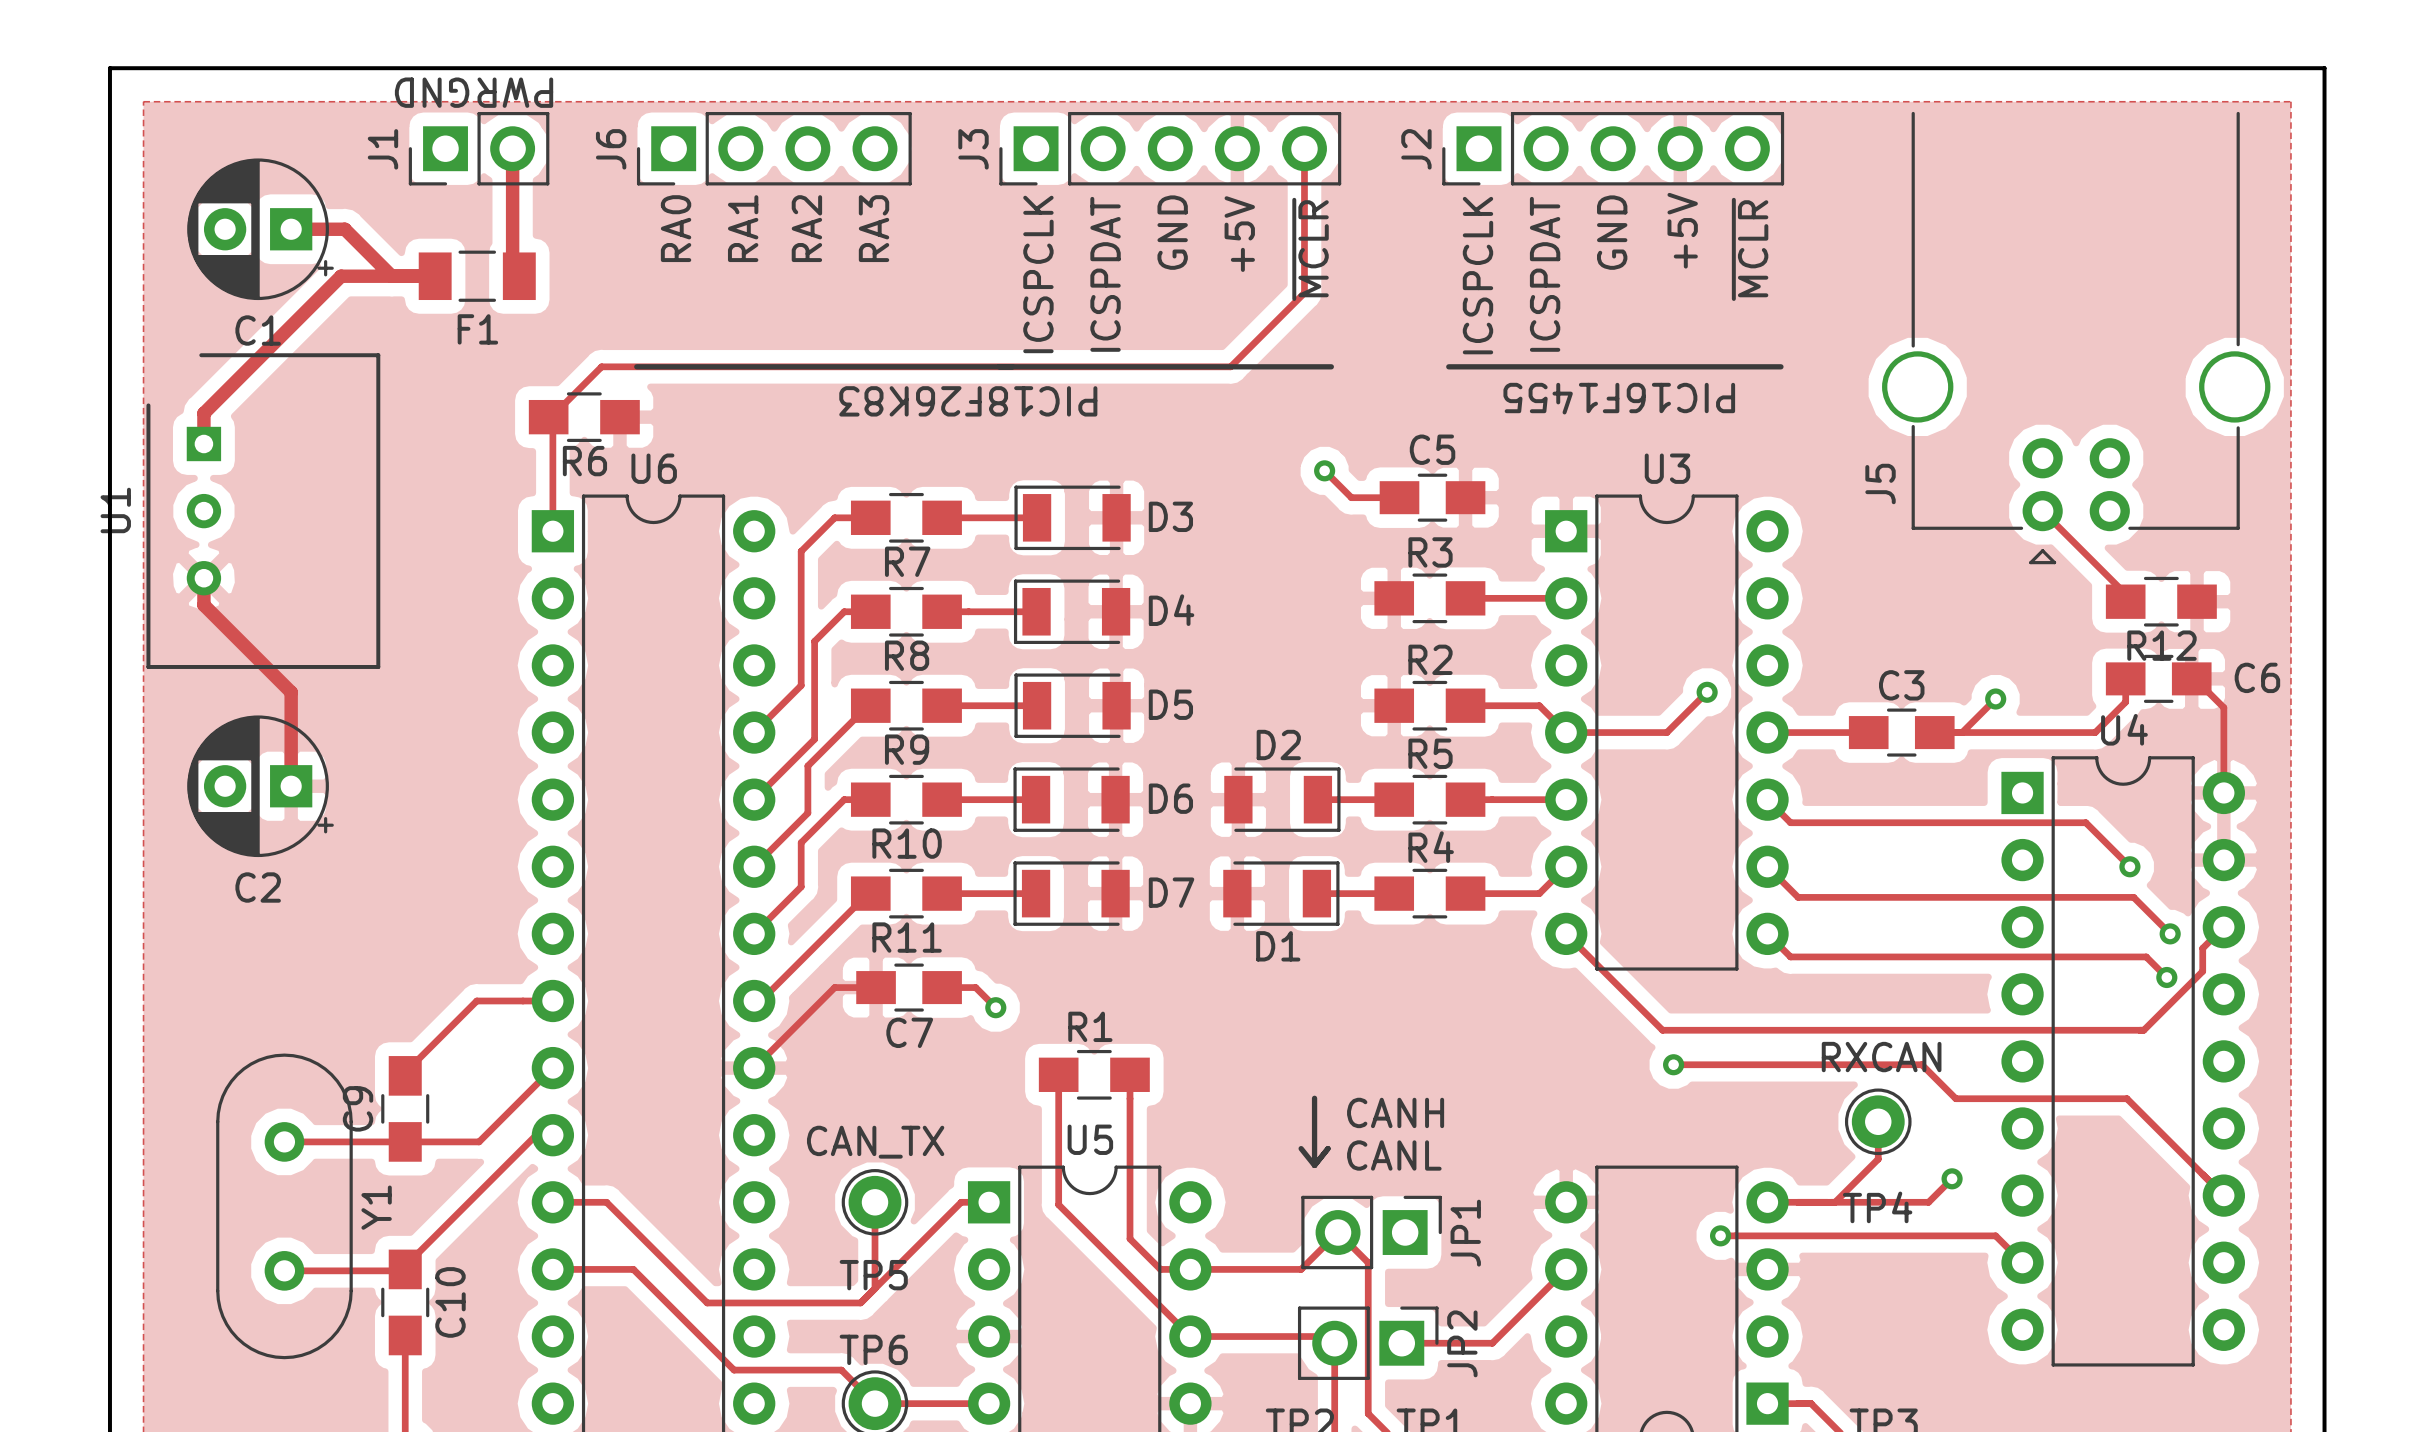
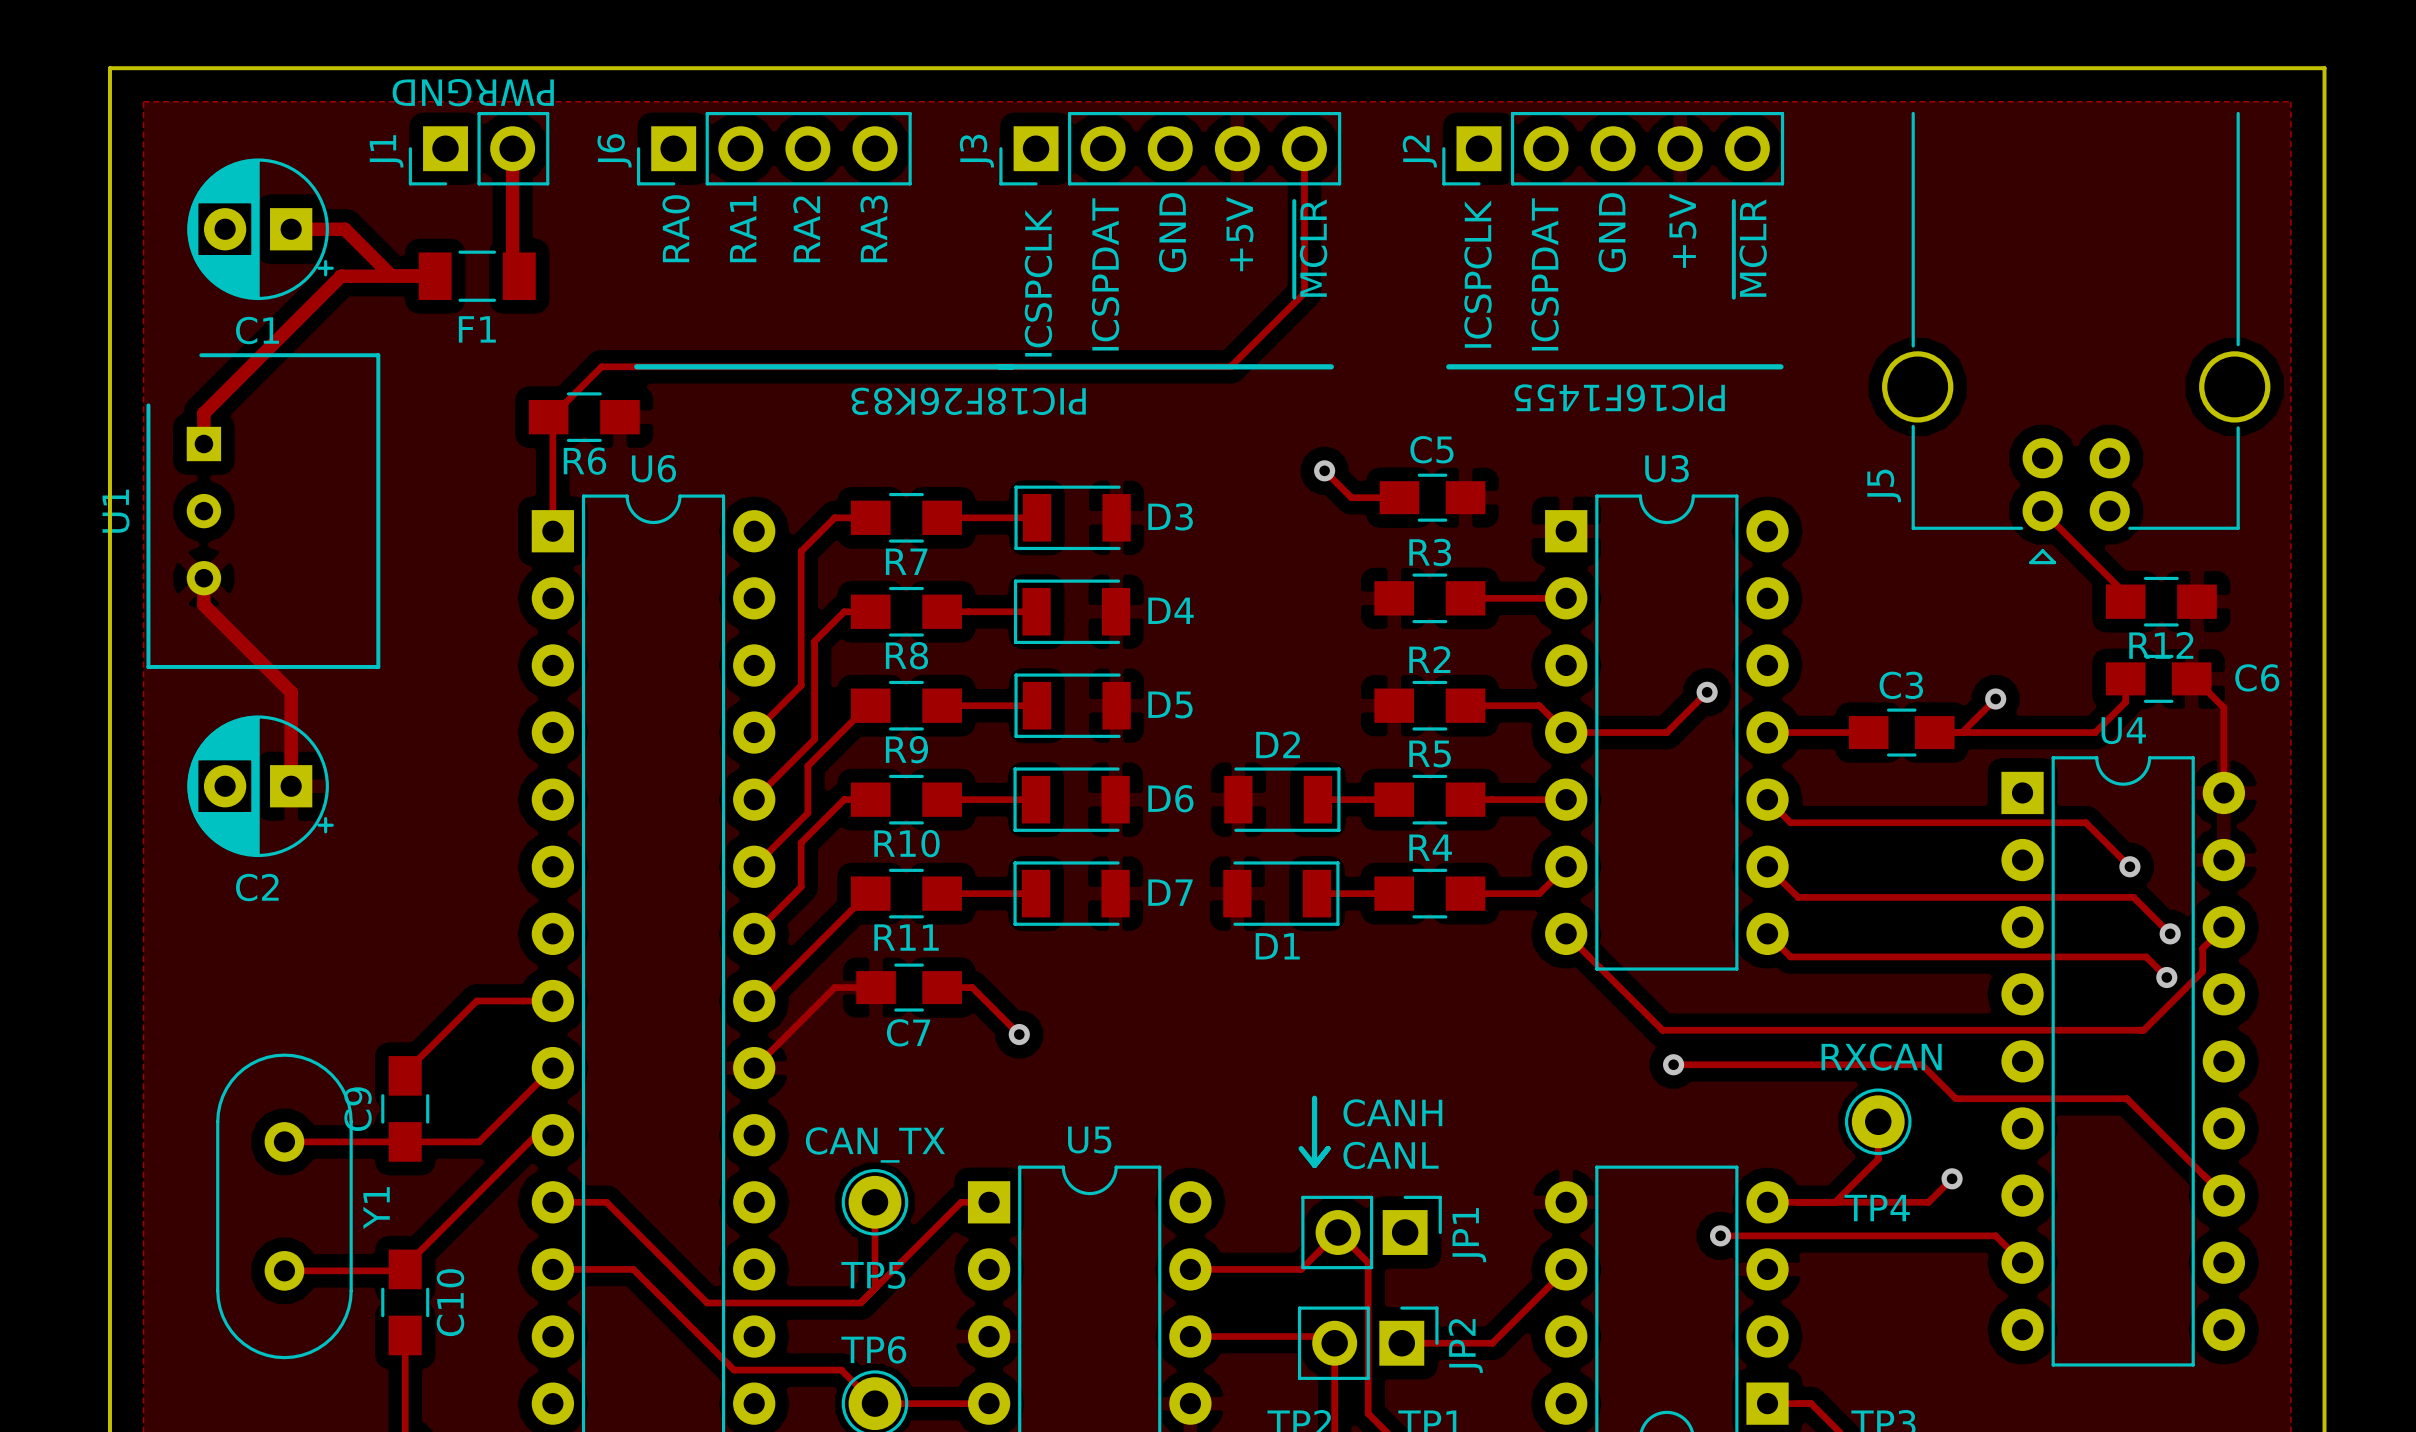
track: (972, 987) (975, 987) (995, 1007) -> (972, 987) (1019, 1034)
via position: (995, 1007) -> (1019, 1034)
track: (1058, 1074) (1058, 1204) (1190, 1336) -> none
R1: (1094, 1074) -> none
track: (1130, 1074) (1130, 1238) (1160, 1269) (1190, 1269) -> none

